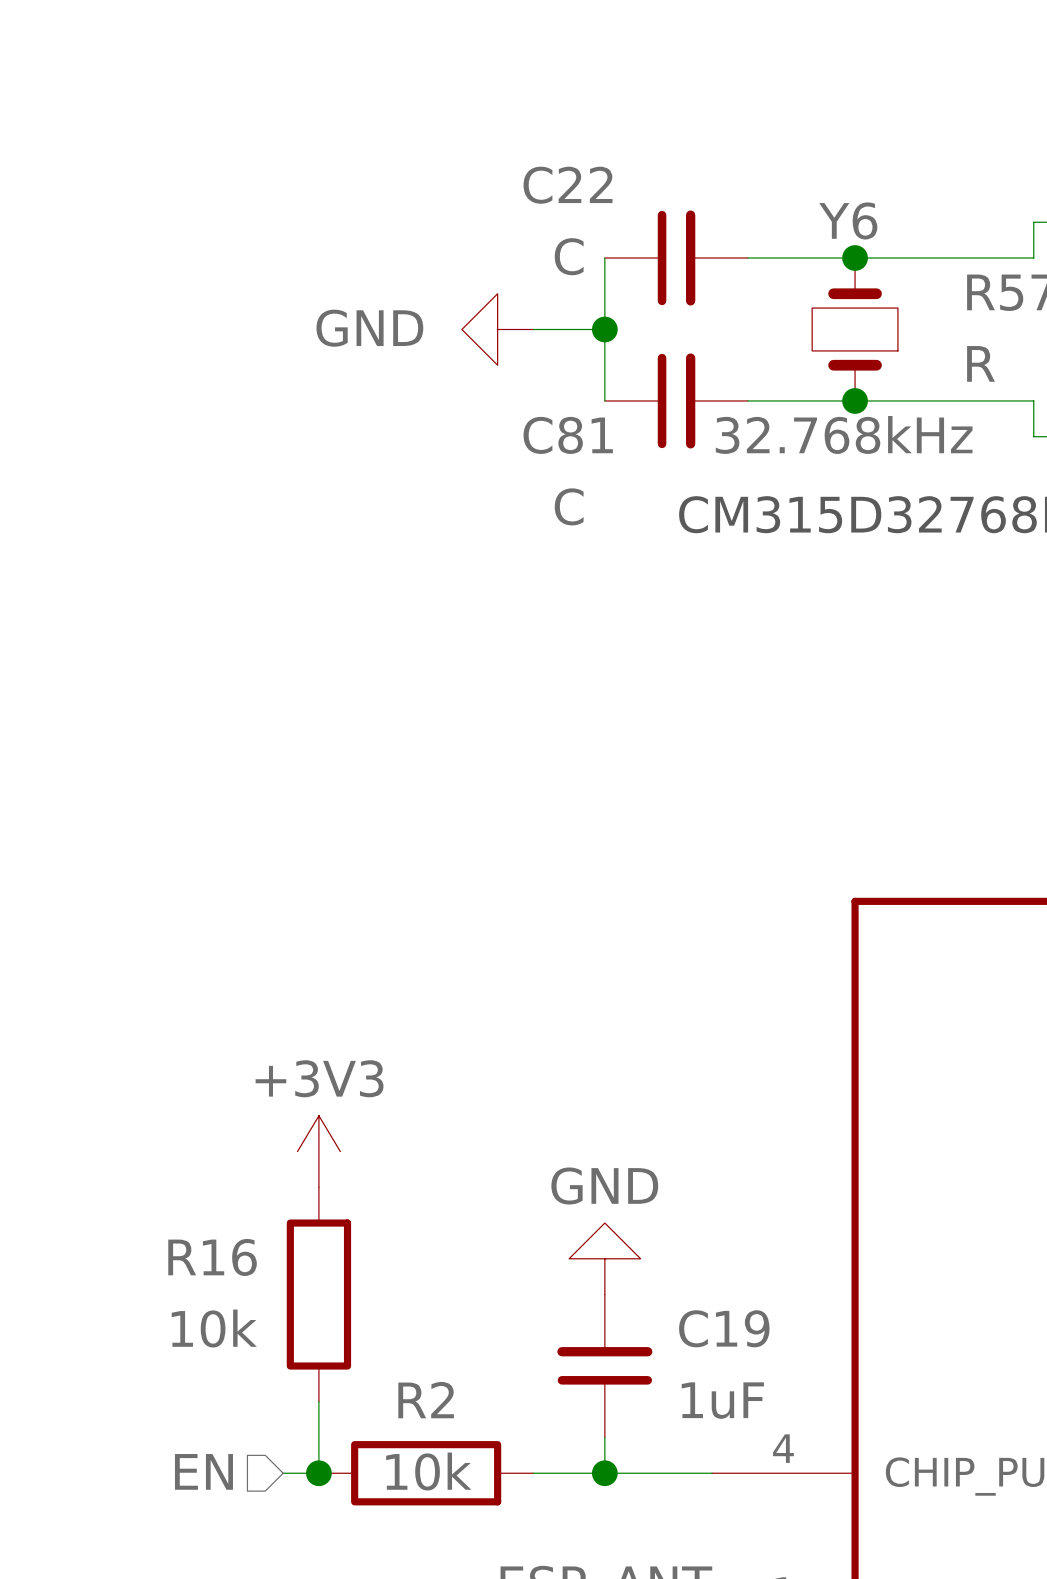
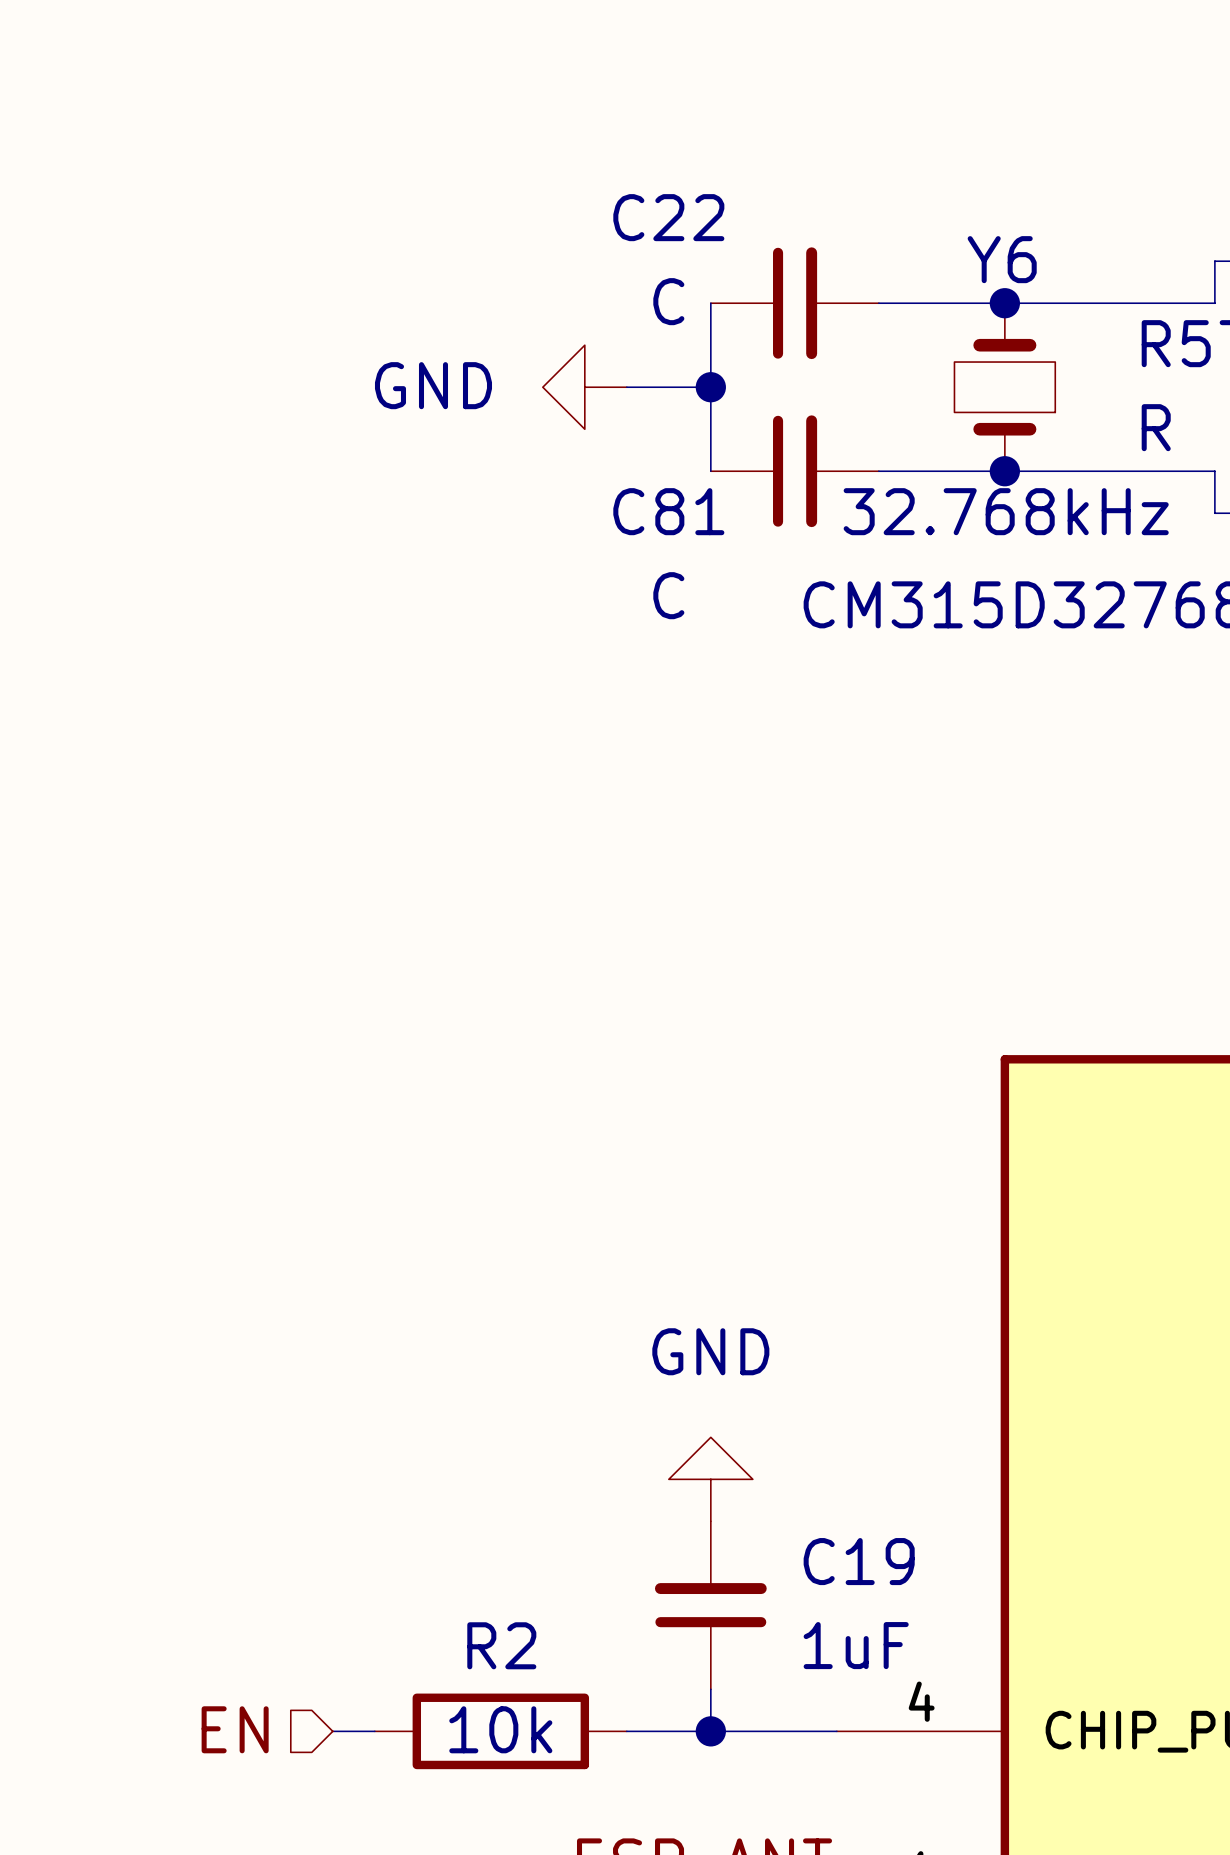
power symbol: +3V3 (318, 1151) -> none
power symbol text position: GND (604, 1185) -> GND (710, 1351)
R16: 10k (318, 1294) -> none
wire: (318, 1401) (318, 1473) -> none
junction: (318, 1473) -> none

